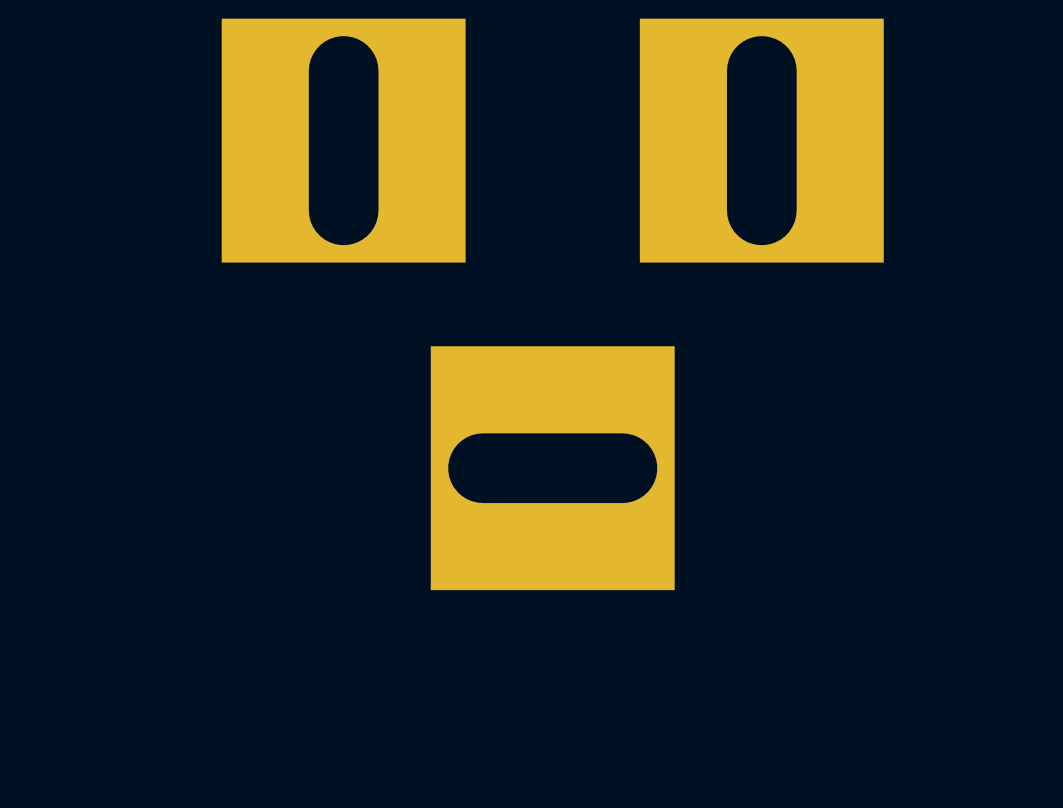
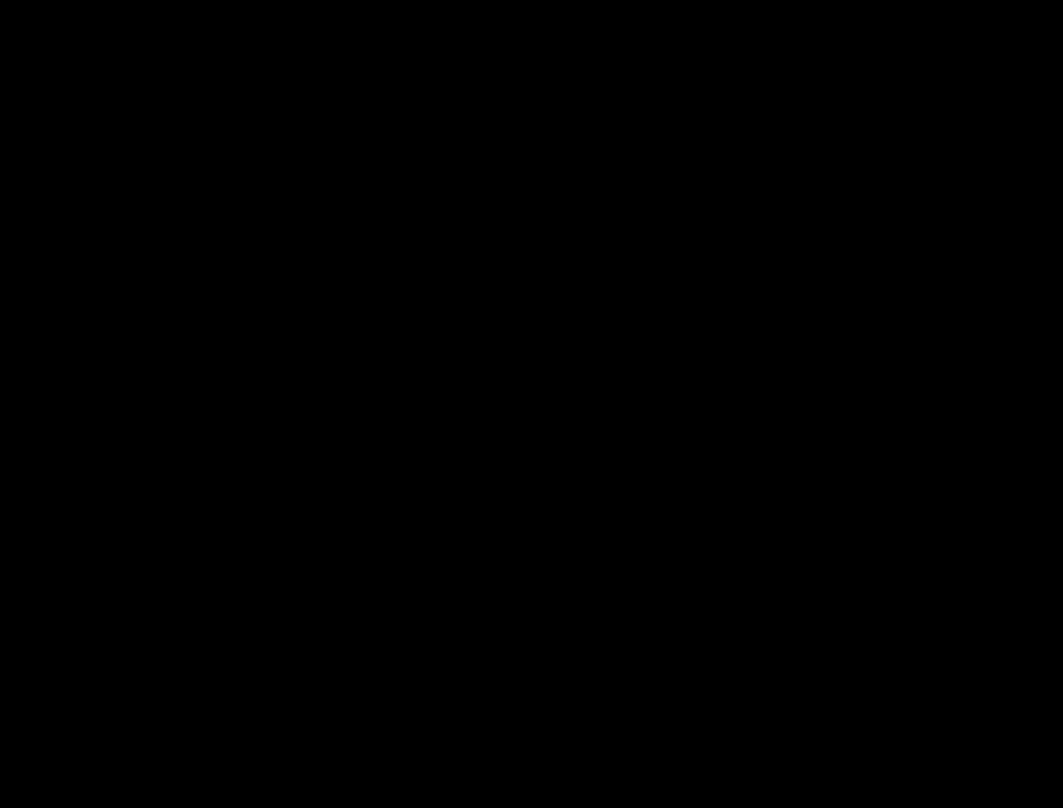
part: (552, 304) -> none

